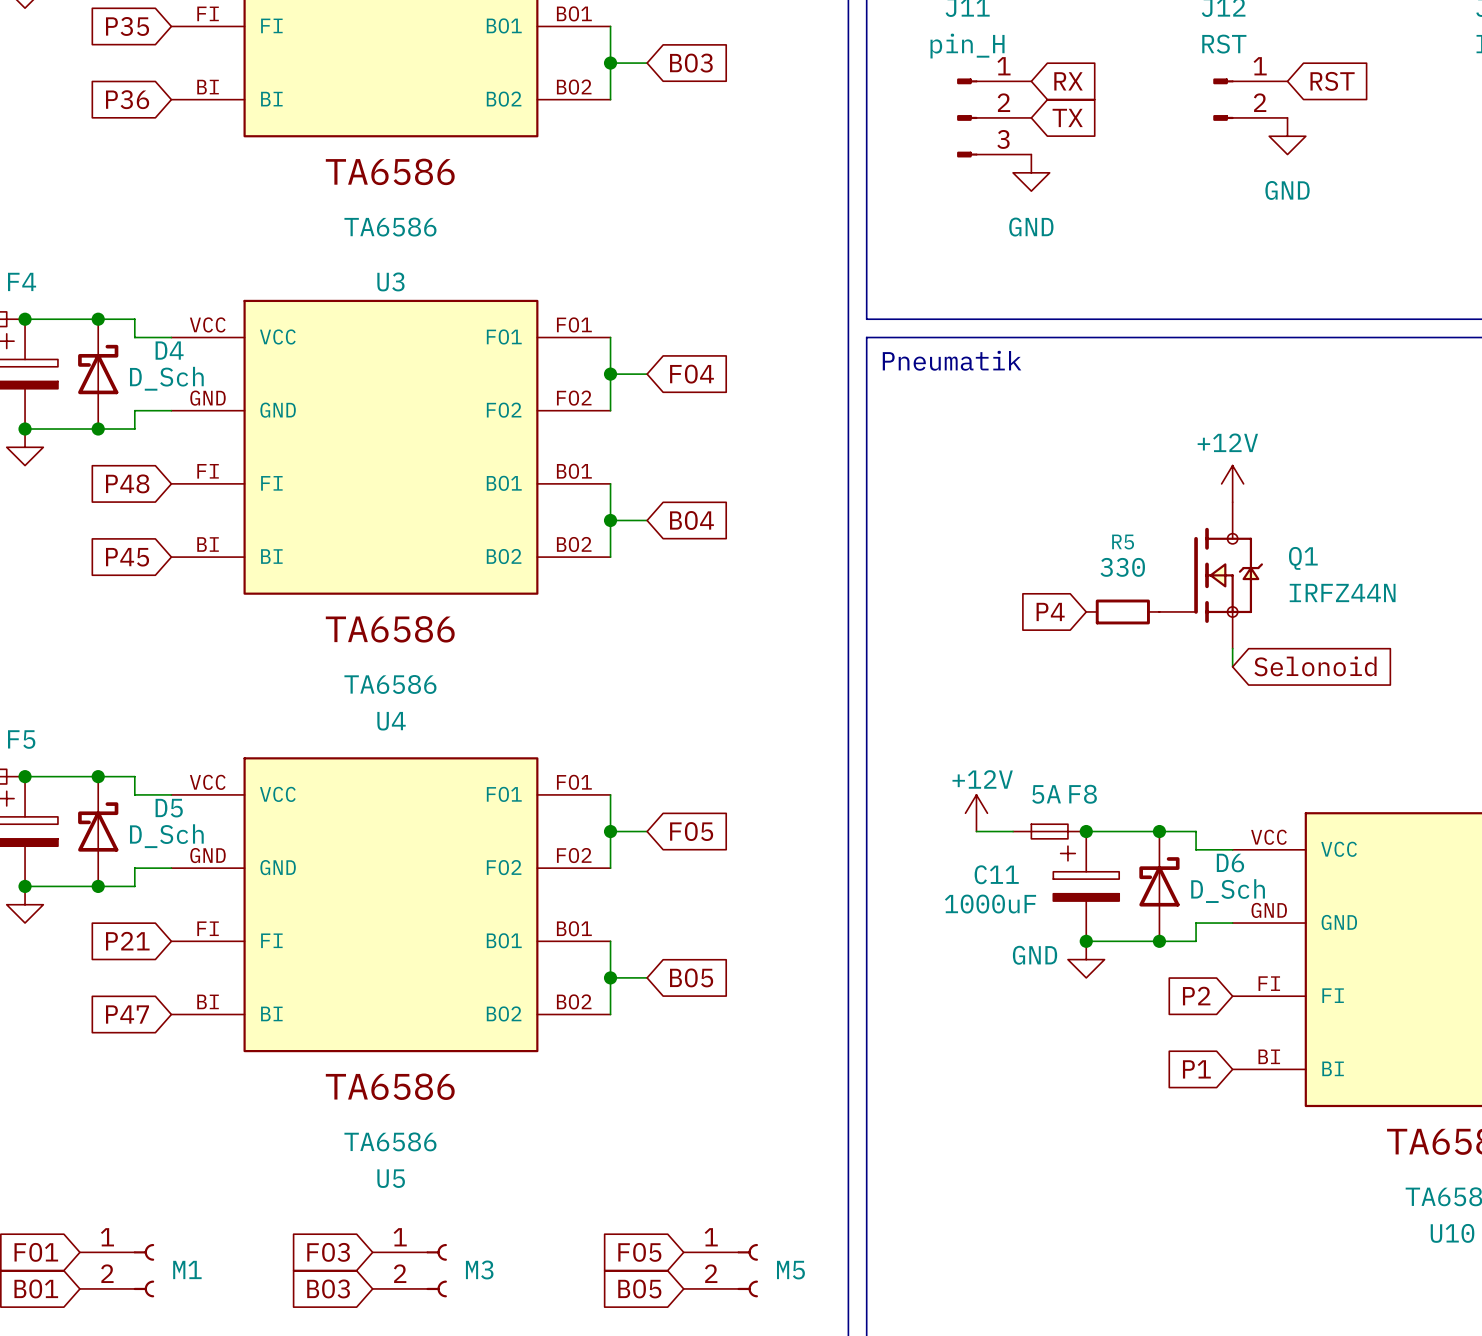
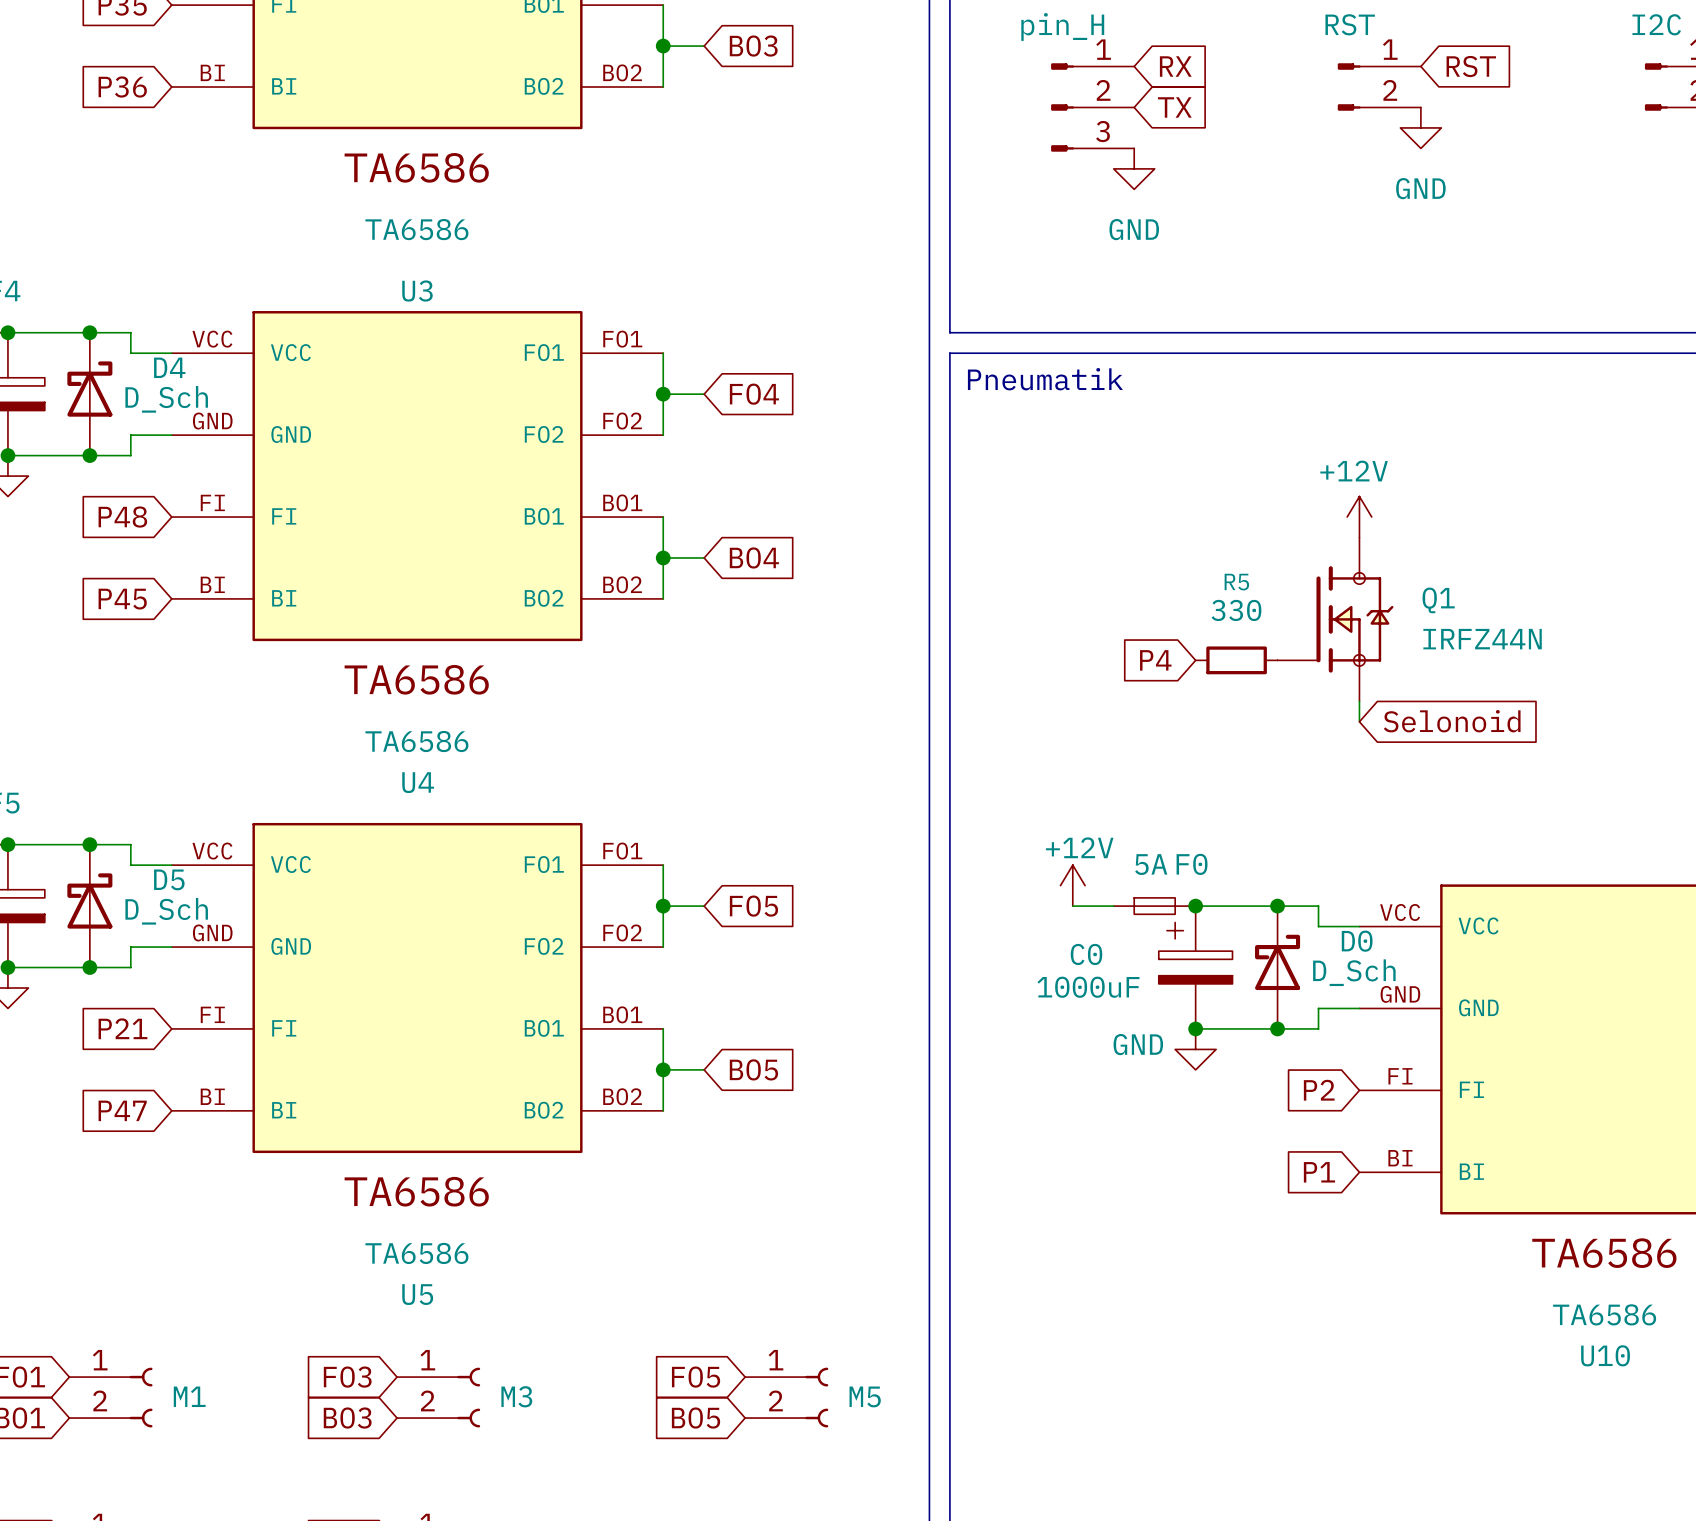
F8 name: F8 (1083, 794) -> F0 (1192, 864)
D6 name: D6 (1230, 863) -> D0 (1357, 941)
C11 name: C11 (996, 874) -> C0 (1086, 954)

